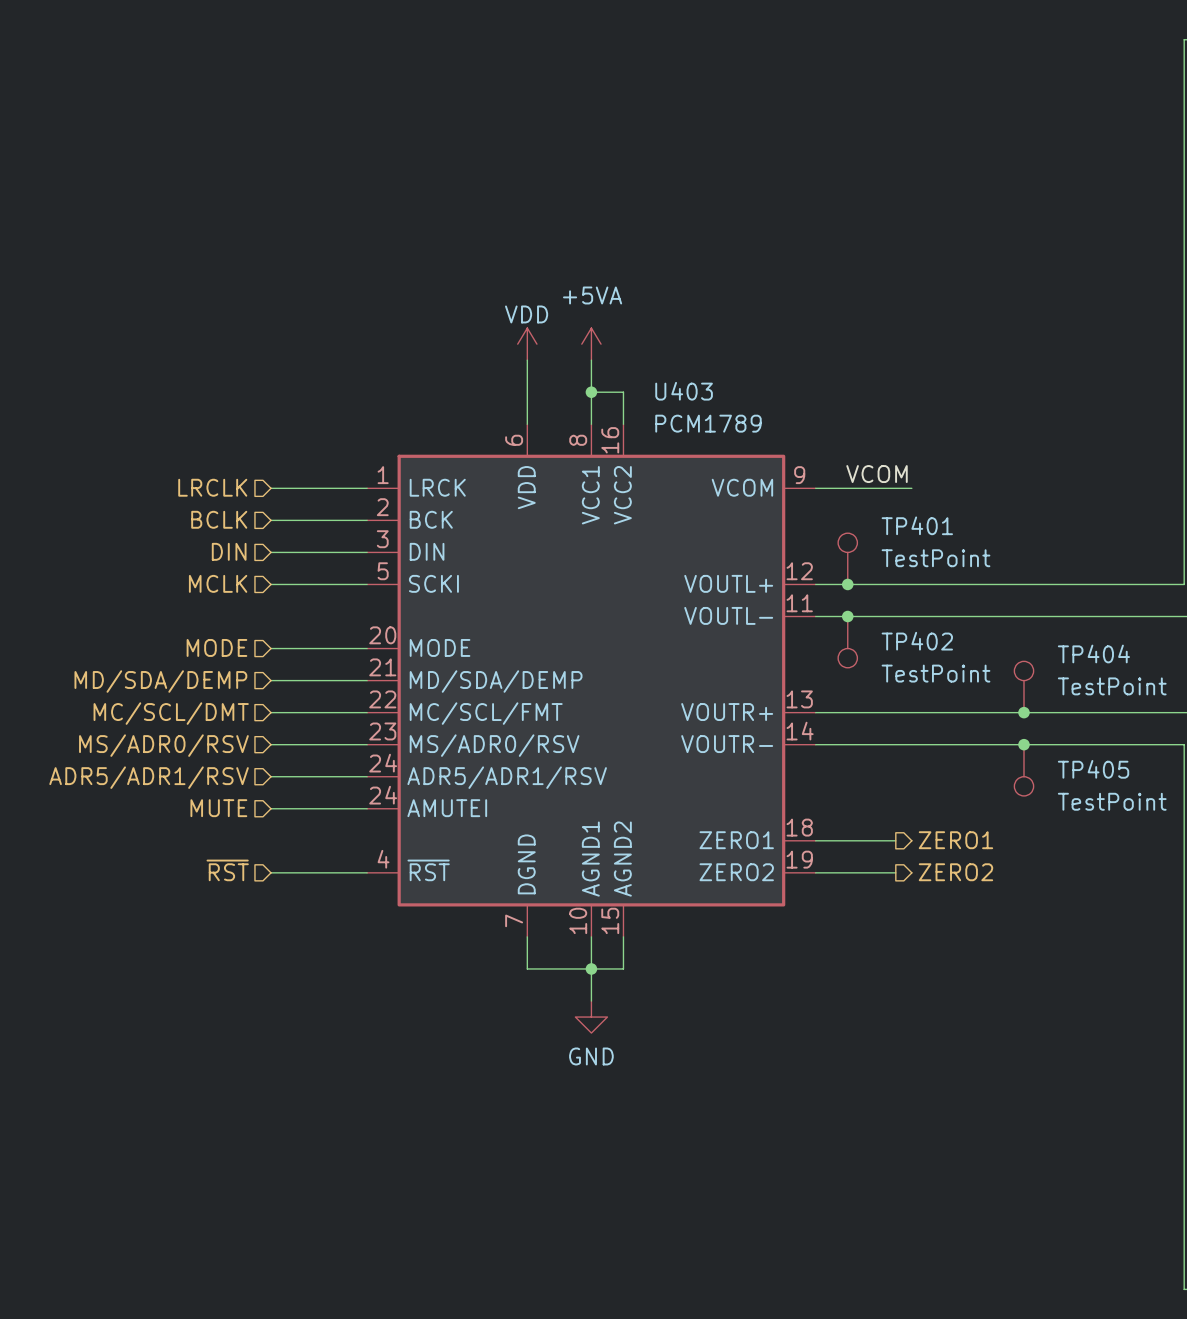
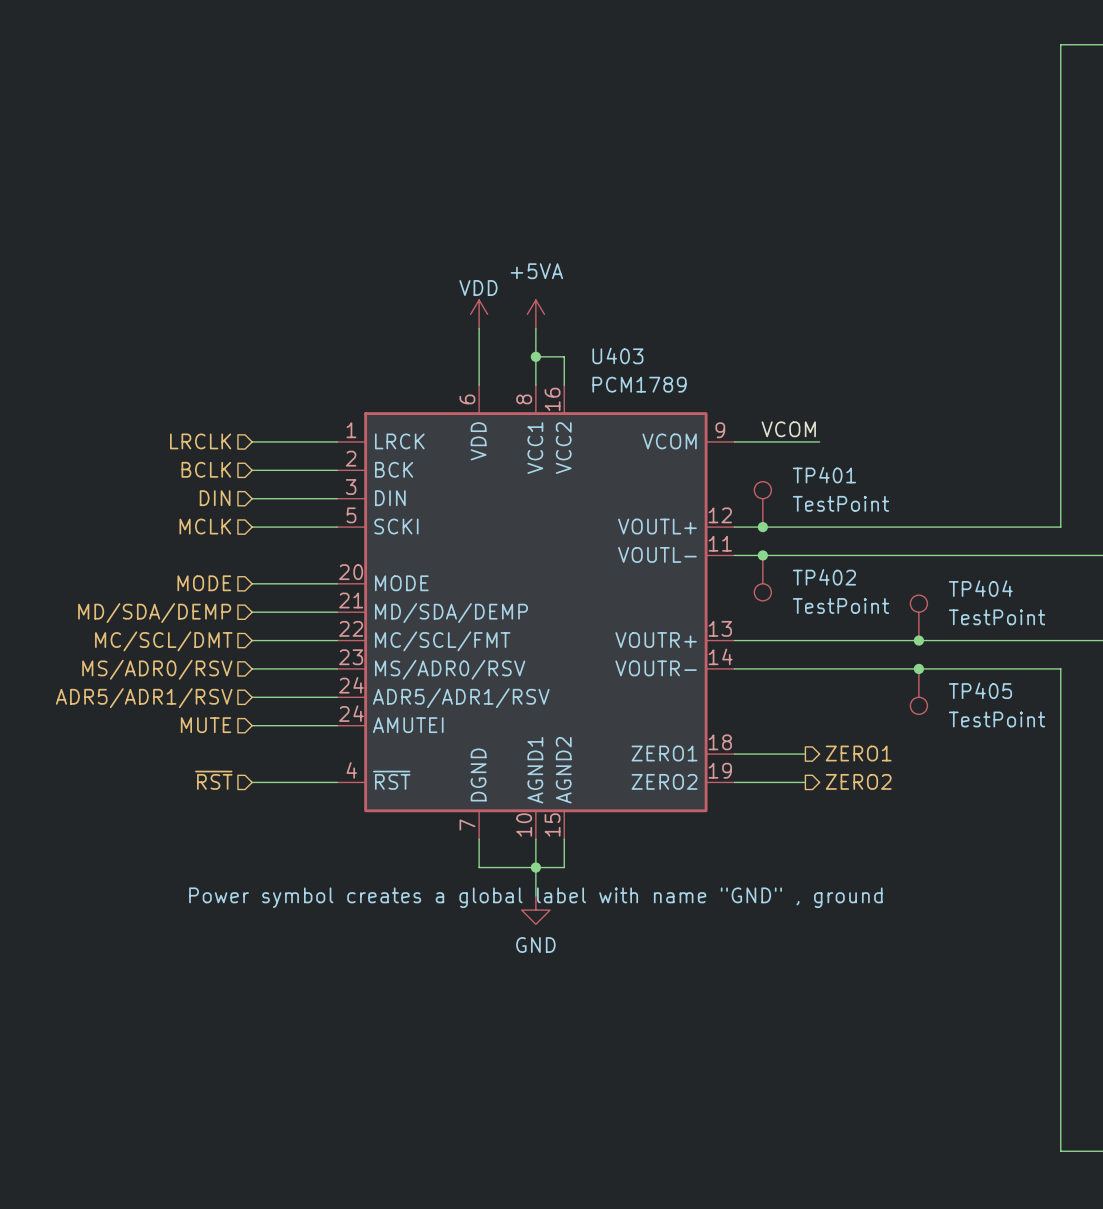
power symbol text: none -> Power symbol creates a global label with name "GND" , ground (535, 897)

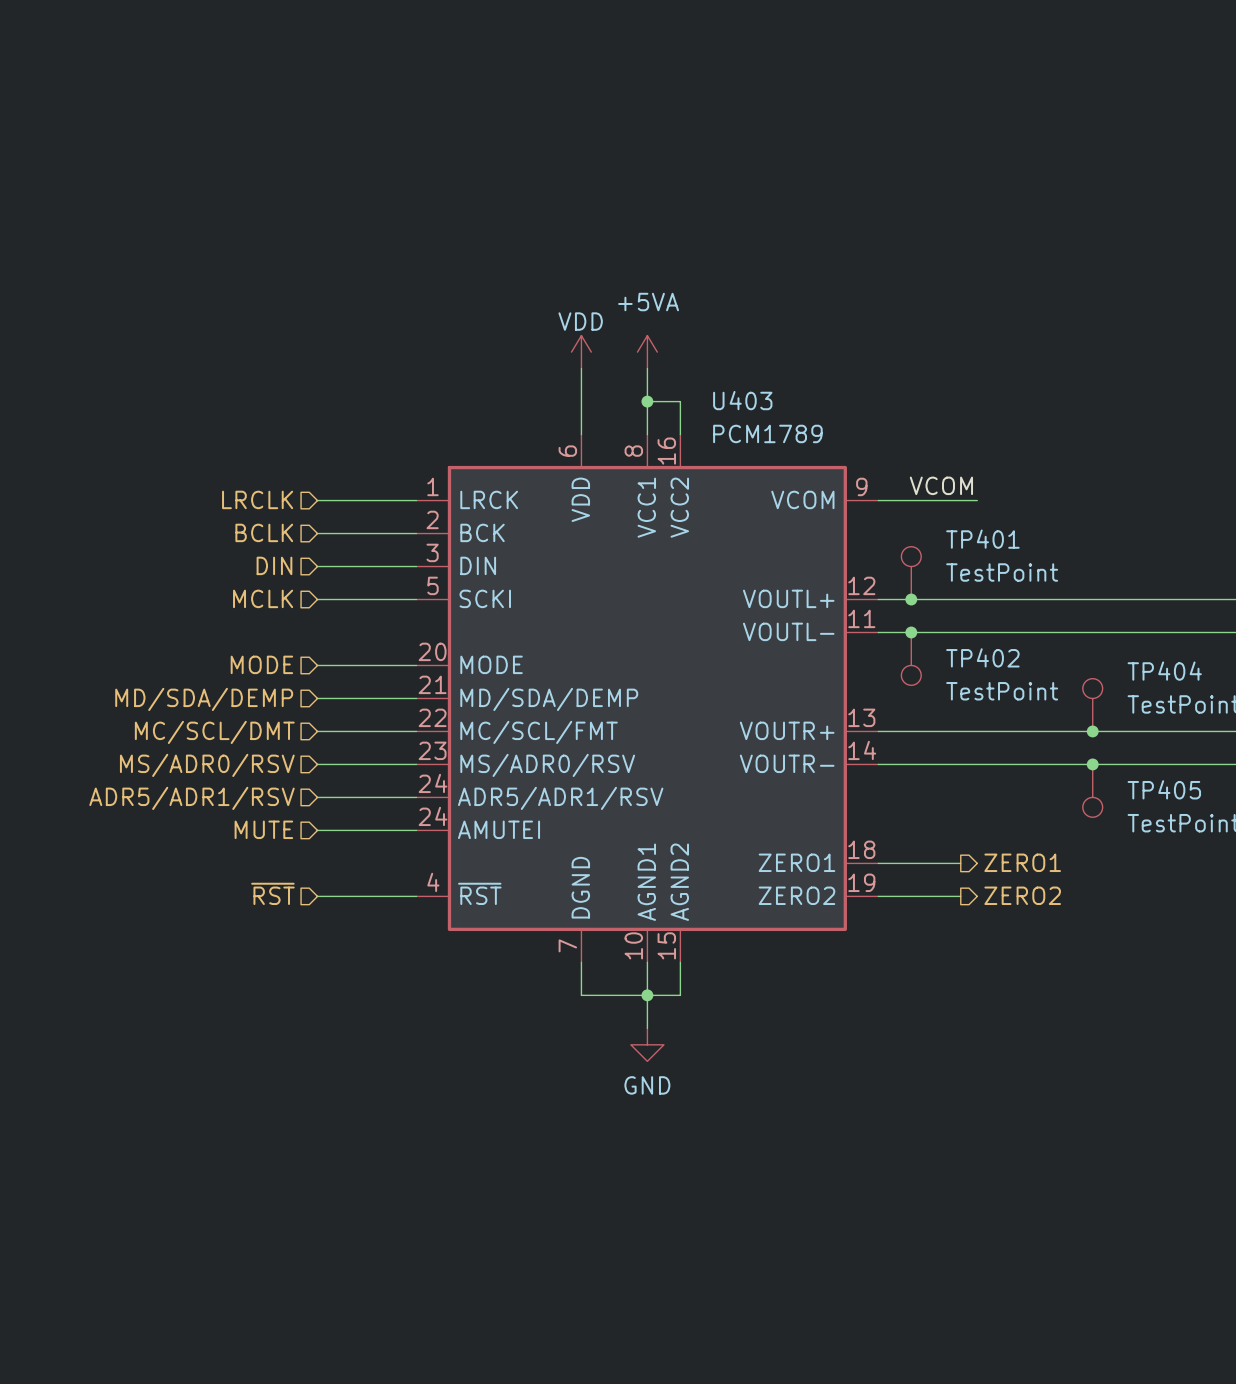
power symbol text: Power symbol creates a global label with name "GND" , ground (535, 897) -> none

